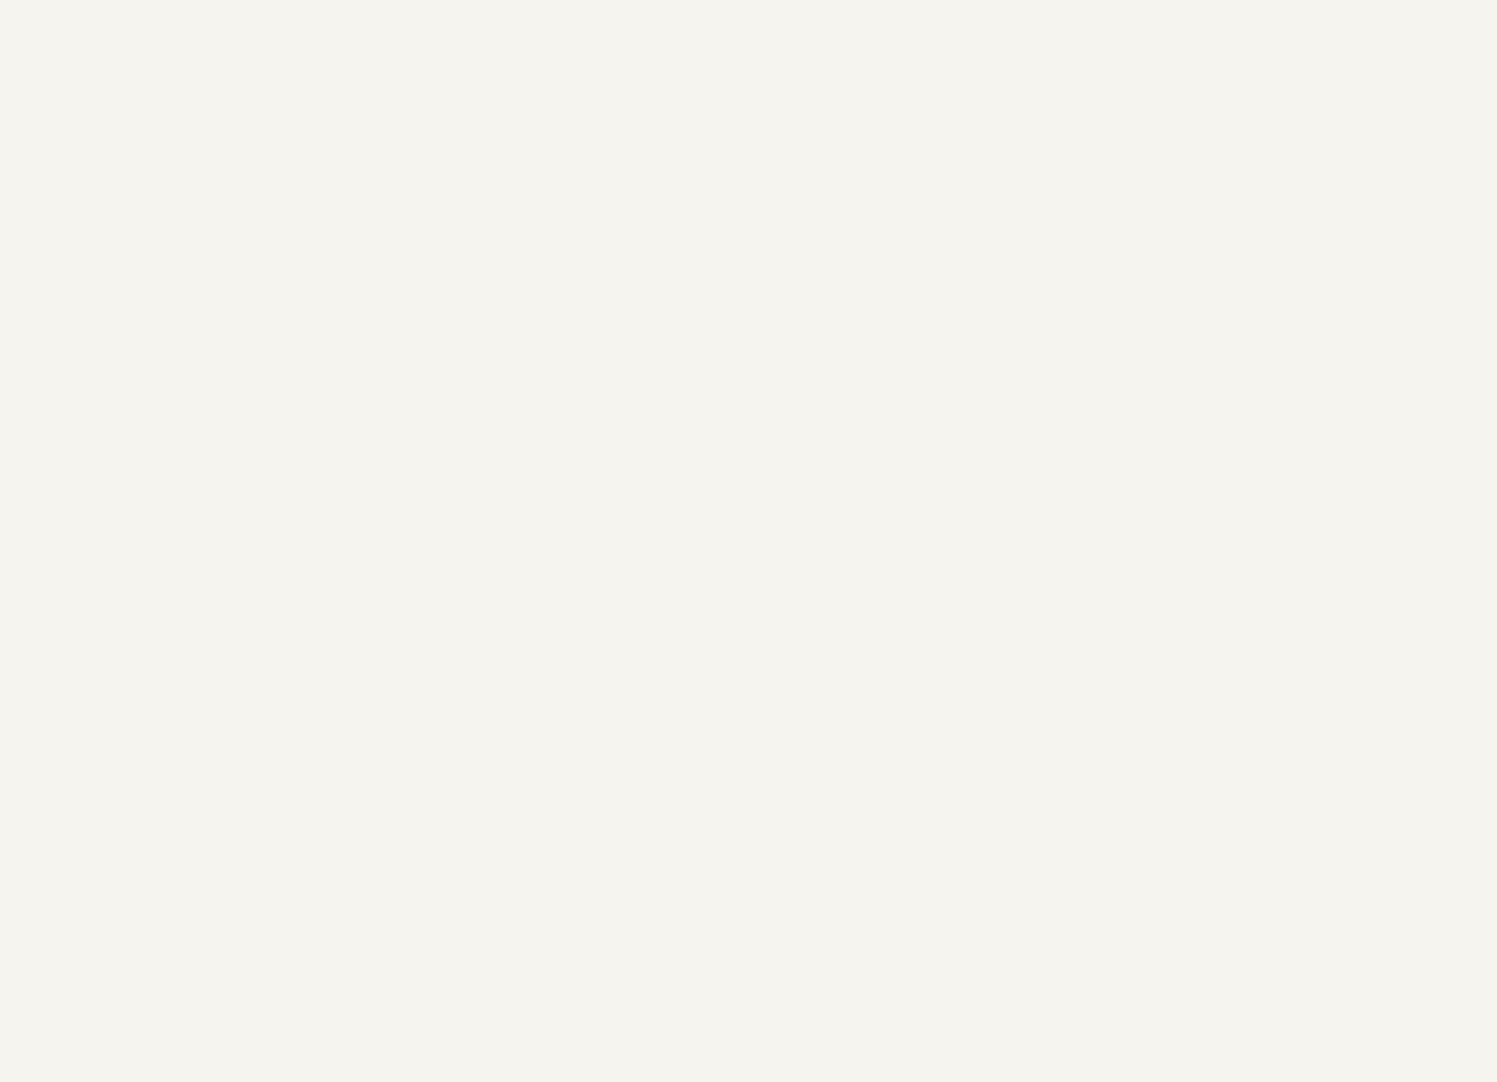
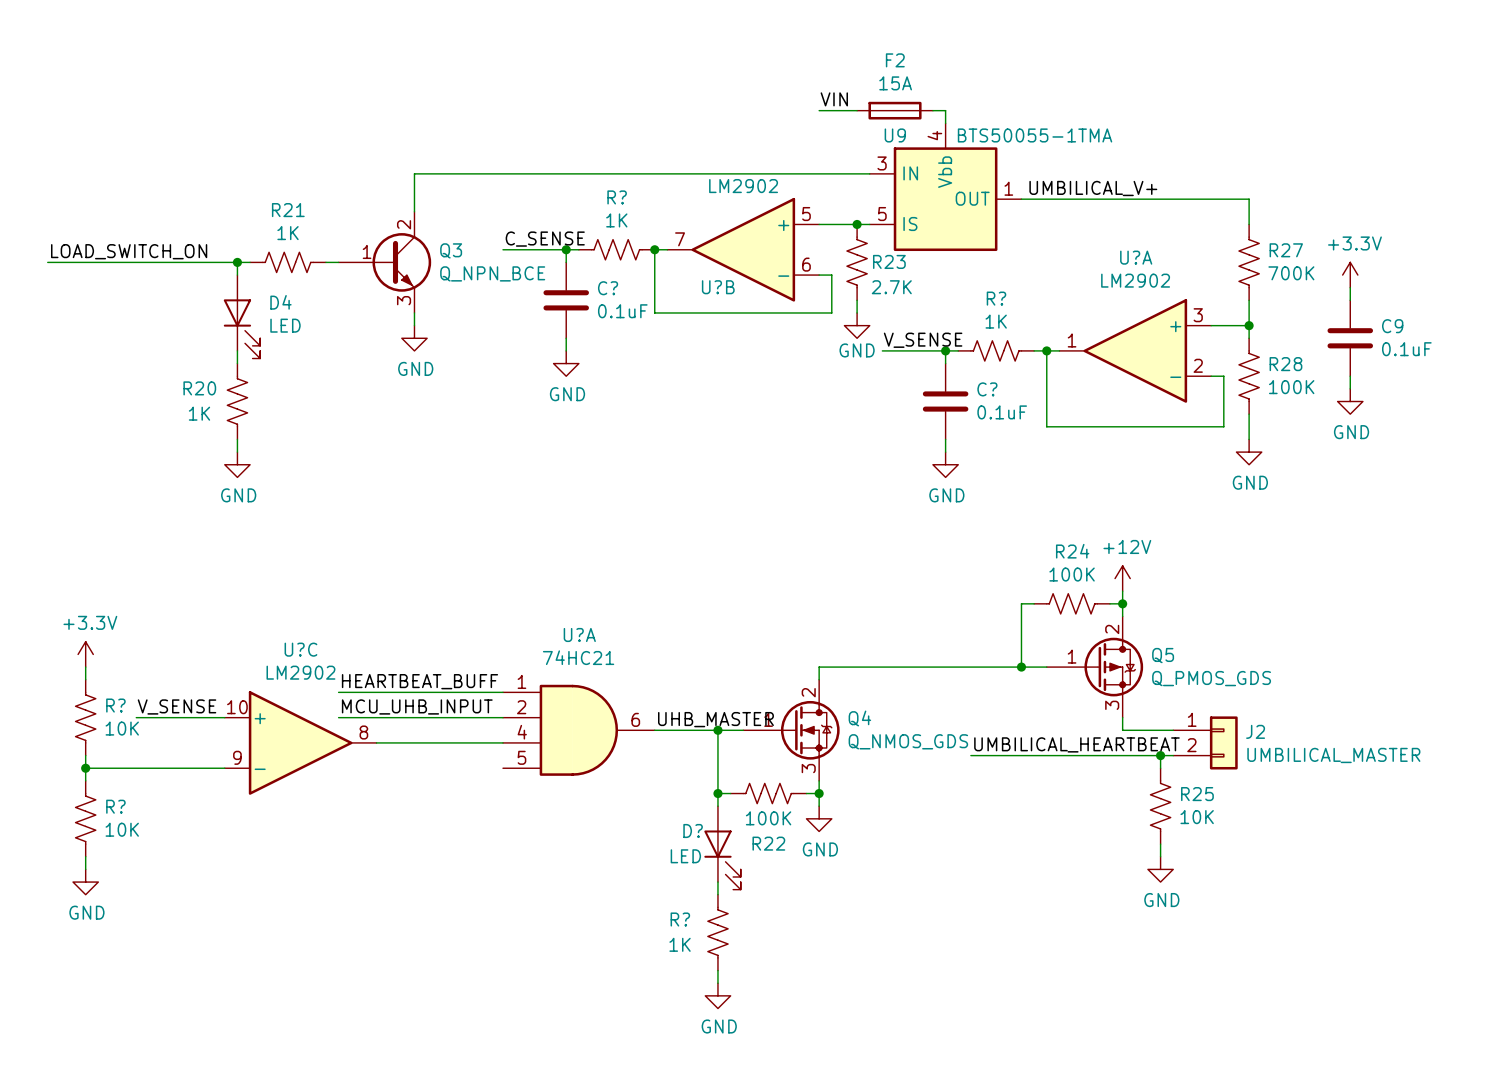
label: none -> VIN (834, 99)
wire: none -> (819, 110) (857, 110)
F2: none -> 15A (895, 110)
wire: none -> (932, 110) (945, 110) (945, 123)
wire: none -> (869, 173) (414, 173) (414, 211)
U9: none -> BTS50055-1TMA (945, 187)
label: none -> UMBILICAL_V+ (1093, 188)
wire: none -> (1021, 199) (1249, 199) (1249, 224)
wire: none -> (819, 224) (869, 224)
junction: none -> (857, 224)
label: none -> C_SENSE (545, 239)
wire: none -> (502, 249) (578, 249)
wire: none -> (566, 249) (566, 262)
junction: none -> (566, 249)
R?: none -> 1K (616, 249)
junction: none -> (654, 249)
wire: none -> (667, 249) (654, 249) (654, 312) (831, 312) (831, 275) (819, 275)
U?B: none -> LM2902 (743, 249)
label: none -> LOAD_SWITCH_ON (129, 251)
wire: none -> (47, 262) (250, 262)
wire: none -> (237, 262) (237, 275)
junction: none -> (237, 262)
R21: none -> 1K (288, 262)
wire: none -> (325, 262) (338, 262)
Q3: none -> Q_NPN_BCE (384, 262)
R23: none -> 2.7K (857, 262)
R27: none -> 700K (1249, 262)
power symbol: none -> +3.3V (1350, 275)
wire: none -> (1350, 287) (1350, 300)
C?: none -> 0.1uF (566, 300)
wire: none -> (857, 300) (857, 312)
wire: none -> (1249, 300) (1249, 338)
wire: none -> (414, 312) (414, 325)
D4: none -> LED (241, 316)
power symbol: none -> GND (857, 325)
wire: none -> (1211, 325) (1249, 325)
junction: none -> (1249, 325)
power symbol: none -> GND (414, 338)
wire: none -> (566, 338) (566, 350)
C9: none -> 0.1uF (1350, 338)
label: none -> V_SENSE (923, 340)
wire: none -> (237, 350) (237, 363)
wire: none -> (882, 350) (958, 350)
wire: none -> (945, 350) (945, 363)
junction: none -> (945, 350)
R?: none -> 1K (996, 350)
wire: none -> (1034, 350) (1059, 350)
wire: none -> (1046, 350) (1046, 426) (1223, 426) (1223, 376) (1211, 376)
junction: none -> (1046, 350)
U?A: none -> LM2902 (1135, 350)
power symbol: none -> GND (566, 363)
R28: none -> 100K (1249, 376)
wire: none -> (1350, 376) (1350, 388)
R20: none -> 1K (237, 401)
C?: none -> 0.1uF (945, 401)
power symbol: none -> GND (1350, 401)
wire: none -> (1249, 414) (1249, 439)
wire: none -> (237, 439) (237, 452)
wire: none -> (945, 439) (945, 452)
power symbol: none -> GND (1249, 452)
power symbol: none -> GND (237, 464)
power symbol: none -> GND (945, 464)
power symbol: none -> +12V (1122, 578)
wire: none -> (1122, 591) (1122, 616)
wire: none -> (1034, 603) (1021, 603) (1021, 667)
R24: none -> 100K (1072, 603)
wire: none -> (1110, 603) (1122, 603)
junction: none -> (1122, 603)
power symbol: none -> +3.3V (85, 654)
wire: none -> (85, 667) (85, 679)
junction: none -> (1021, 667)
wire: none -> (1046, 667) (819, 667) (819, 679)
Q5: none -> Q_PMOS_GDS (1094, 667)
label: none -> HEARTBEAT_BUFF (419, 681)
wire: none -> (338, 692) (502, 692)
label: none -> V_SENSE (177, 706)
label: none -> MCU_UHB_INPUT (417, 706)
R?: none -> 10K (85, 717)
wire: none -> (136, 717) (224, 717)
wire: none -> (338, 717) (502, 717)
wire: none -> (1122, 717) (1122, 730) (1173, 730)
label: none -> UHB_MASTER (715, 719)
U?A: none -> 74HC21 (578, 730)
wire: none -> (654, 730) (743, 730)
wire: none -> (717, 730) (717, 806)
junction: none -> (717, 730)
Q4: none -> Q_NMOS_GDS (791, 730)
U?C: none -> LM2902 (300, 742)
wire: none -> (376, 742) (502, 742)
J2: none -> UMBILICAL_MASTER (1205, 742)
label: none -> UMBILICAL_HEARTBEAT (1076, 744)
wire: none -> (85, 755) (85, 780)
wire: none -> (970, 755) (1173, 755)
wire: none -> (1160, 755) (1160, 768)
junction: none -> (1160, 755)
wire: none -> (85, 768) (224, 768)
junction: none -> (85, 768)
wire: none -> (819, 780) (819, 806)
wire: none -> (717, 793) (730, 793)
junction: none -> (717, 793)
R22: none -> 100K (768, 793)
wire: none -> (806, 793) (819, 793)
junction: none -> (819, 793)
R25: none -> 10K (1160, 806)
R?: none -> 10K (85, 818)
power symbol: none -> GND (819, 818)
wire: none -> (1160, 844) (1160, 856)
D?: none -> LED (722, 847)
wire: none -> (85, 856) (85, 869)
power symbol: none -> GND (1160, 869)
power symbol: none -> GND (85, 882)
wire: none -> (717, 882) (717, 894)
R?: none -> 1K (717, 932)
wire: none -> (717, 970) (717, 983)
power symbol: none -> GND (717, 995)

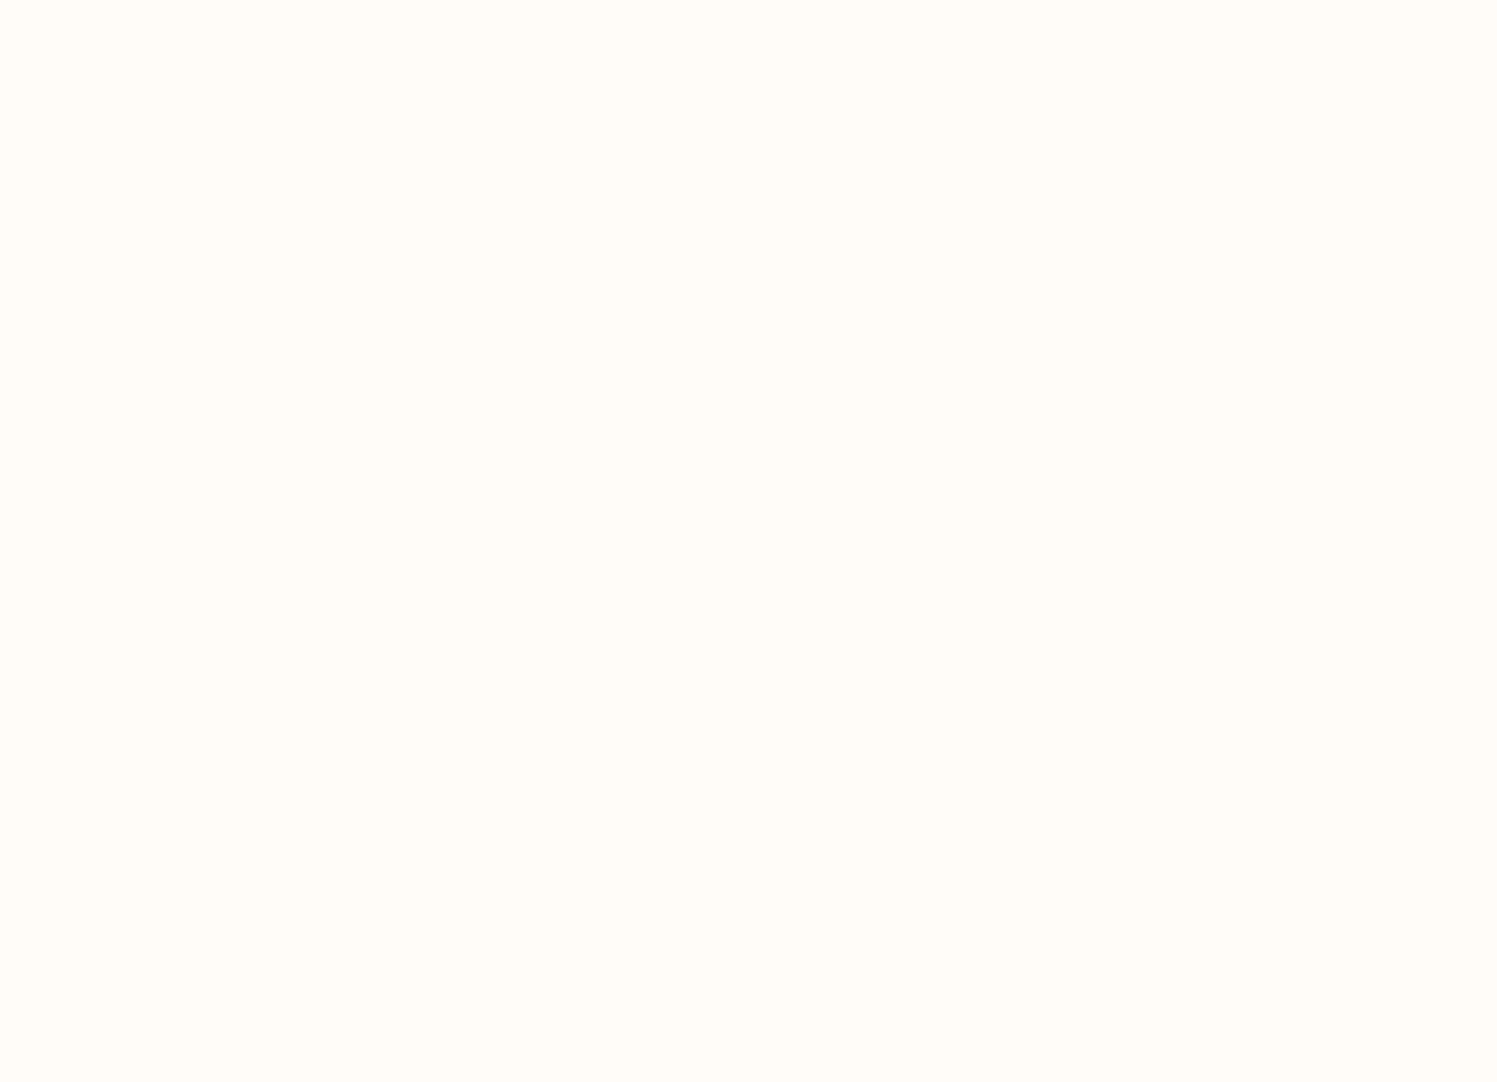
label: VIN (834, 99) -> none
wire: (819, 110) (857, 110) -> none
F2: 15A (895, 110) -> none
wire: (932, 110) (945, 110) (945, 123) -> none
wire: (869, 173) (414, 173) (414, 211) -> none
U9: BTS50055-1TMA (945, 187) -> none
label: UMBILICAL_V+ (1093, 188) -> none
wire: (1021, 199) (1249, 199) (1249, 224) -> none
wire: (819, 224) (869, 224) -> none
junction: (857, 224) -> none
label: C_SENSE (545, 239) -> none
wire: (502, 249) (578, 249) -> none
wire: (566, 249) (566, 262) -> none
junction: (566, 249) -> none
R?: 1K (616, 249) -> none
junction: (654, 249) -> none
wire: (667, 249) (654, 249) (654, 312) (831, 312) (831, 275) (819, 275) -> none
U?B: LM2902 (743, 249) -> none
label: LOAD_SWITCH_ON (129, 251) -> none
wire: (47, 262) (250, 262) -> none
wire: (237, 262) (237, 275) -> none
junction: (237, 262) -> none
R21: 1K (288, 262) -> none
wire: (325, 262) (338, 262) -> none
Q3: Q_NPN_BCE (384, 262) -> none
R23: 2.7K (857, 262) -> none
R27: 700K (1249, 262) -> none
power symbol: +3.3V (1350, 275) -> none
wire: (1350, 287) (1350, 300) -> none
C?: 0.1uF (566, 300) -> none
wire: (857, 300) (857, 312) -> none
wire: (1249, 300) (1249, 338) -> none
wire: (414, 312) (414, 325) -> none
D4: LED (241, 316) -> none
power symbol: GND (857, 325) -> none
wire: (1211, 325) (1249, 325) -> none
junction: (1249, 325) -> none
power symbol: GND (414, 338) -> none
wire: (566, 338) (566, 350) -> none
C9: 0.1uF (1350, 338) -> none
label: V_SENSE (923, 340) -> none
wire: (237, 350) (237, 363) -> none
wire: (882, 350) (958, 350) -> none
wire: (945, 350) (945, 363) -> none
junction: (945, 350) -> none
R?: 1K (996, 350) -> none
wire: (1034, 350) (1059, 350) -> none
wire: (1046, 350) (1046, 426) (1223, 426) (1223, 376) (1211, 376) -> none
junction: (1046, 350) -> none
U?A: LM2902 (1135, 350) -> none
power symbol: GND (566, 363) -> none
R28: 100K (1249, 376) -> none
wire: (1350, 376) (1350, 388) -> none
R20: 1K (237, 401) -> none
C?: 0.1uF (945, 401) -> none
power symbol: GND (1350, 401) -> none
wire: (1249, 414) (1249, 439) -> none
wire: (237, 439) (237, 452) -> none
wire: (945, 439) (945, 452) -> none
power symbol: GND (1249, 452) -> none
power symbol: GND (237, 464) -> none
power symbol: GND (945, 464) -> none
power symbol: +12V (1122, 578) -> none
wire: (1122, 591) (1122, 616) -> none
wire: (1034, 603) (1021, 603) (1021, 667) -> none
R24: 100K (1072, 603) -> none
wire: (1110, 603) (1122, 603) -> none
junction: (1122, 603) -> none
power symbol: +3.3V (85, 654) -> none
wire: (85, 667) (85, 679) -> none
junction: (1021, 667) -> none
wire: (1046, 667) (819, 667) (819, 679) -> none
Q5: Q_PMOS_GDS (1094, 667) -> none
label: HEARTBEAT_BUFF (419, 681) -> none
wire: (338, 692) (502, 692) -> none
label: V_SENSE (177, 706) -> none
label: MCU_UHB_INPUT (417, 706) -> none
R?: 10K (85, 717) -> none
wire: (136, 717) (224, 717) -> none
wire: (338, 717) (502, 717) -> none
wire: (1122, 717) (1122, 730) (1173, 730) -> none
label: UHB_MASTER (715, 719) -> none
U?A: 74HC21 (578, 730) -> none
wire: (654, 730) (743, 730) -> none
wire: (717, 730) (717, 806) -> none
junction: (717, 730) -> none
Q4: Q_NMOS_GDS (791, 730) -> none
U?C: LM2902 (300, 742) -> none
wire: (376, 742) (502, 742) -> none
J2: UMBILICAL_MASTER (1205, 742) -> none
label: UMBILICAL_HEARTBEAT (1076, 744) -> none
wire: (85, 755) (85, 780) -> none
wire: (970, 755) (1173, 755) -> none
wire: (1160, 755) (1160, 768) -> none
junction: (1160, 755) -> none
wire: (85, 768) (224, 768) -> none
junction: (85, 768) -> none
wire: (819, 780) (819, 806) -> none
wire: (717, 793) (730, 793) -> none
junction: (717, 793) -> none
R22: 100K (768, 793) -> none
wire: (806, 793) (819, 793) -> none
junction: (819, 793) -> none
R25: 10K (1160, 806) -> none
R?: 10K (85, 818) -> none
power symbol: GND (819, 818) -> none
wire: (1160, 844) (1160, 856) -> none
D?: LED (722, 847) -> none
wire: (85, 856) (85, 869) -> none
power symbol: GND (1160, 869) -> none
power symbol: GND (85, 882) -> none
wire: (717, 882) (717, 894) -> none
R?: 1K (717, 932) -> none
wire: (717, 970) (717, 983) -> none
power symbol: GND (717, 995) -> none

